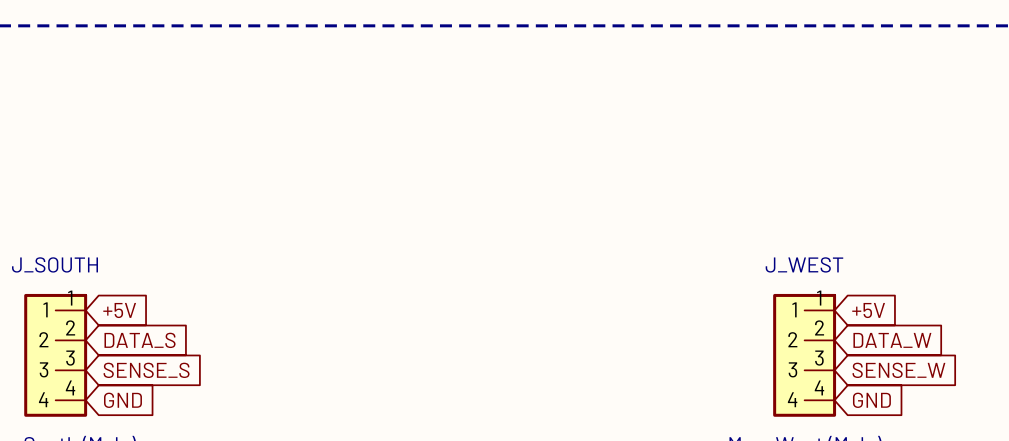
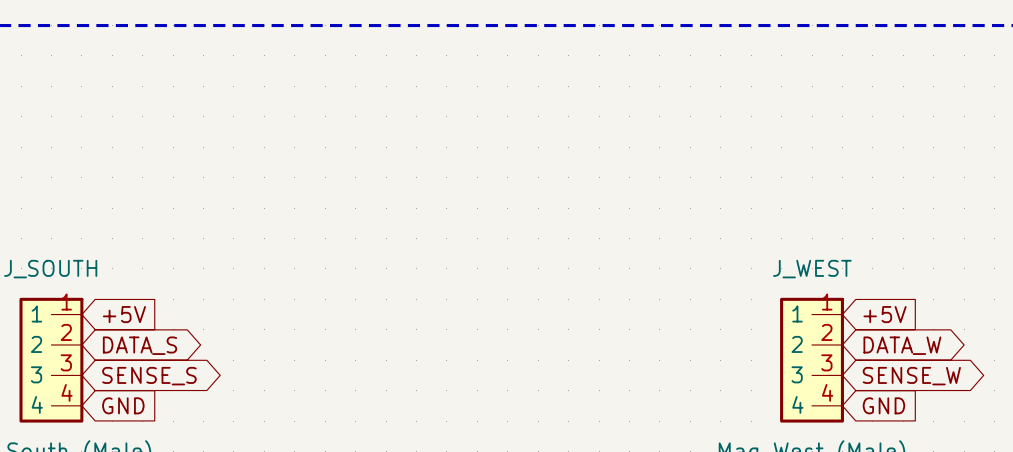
global label shape: input (140, 340) -> bidirectional (140, 345)
global label shape: input (892, 340) -> bidirectional (902, 345)
global label shape: input (146, 370) -> bidirectional (149, 376)
global label shape: input (898, 370) -> bidirectional (911, 376)

